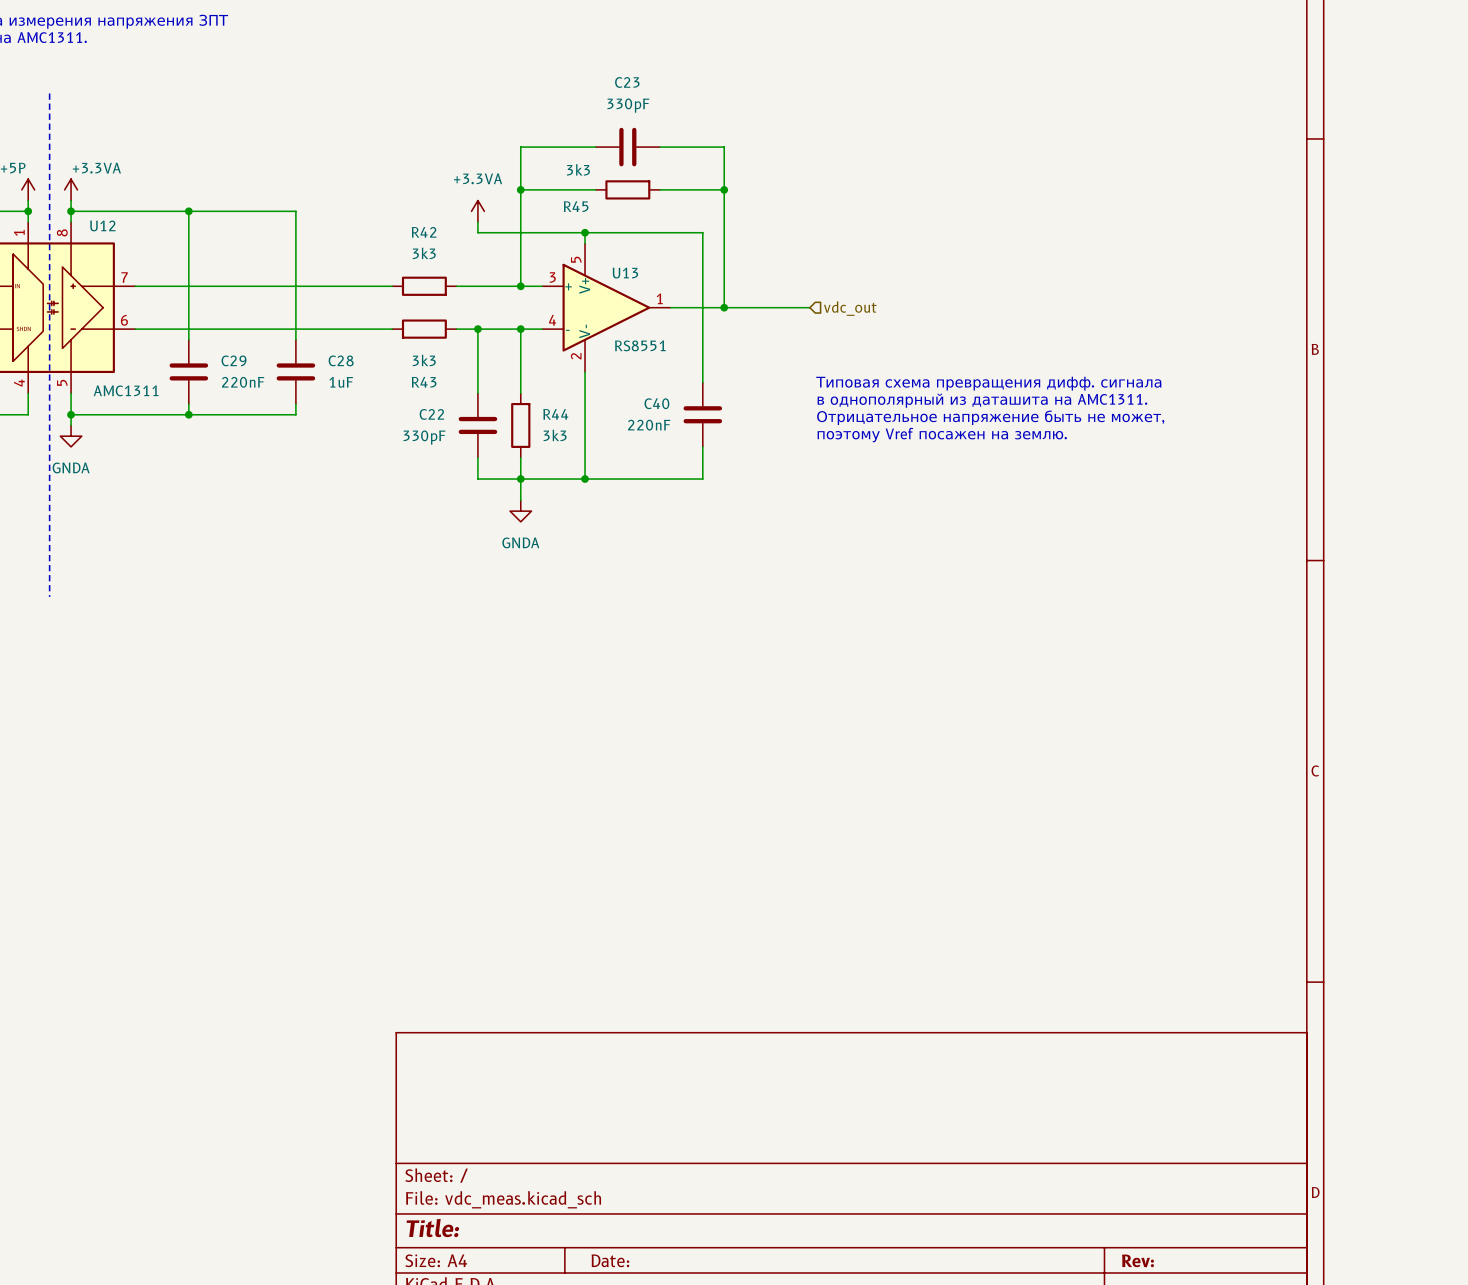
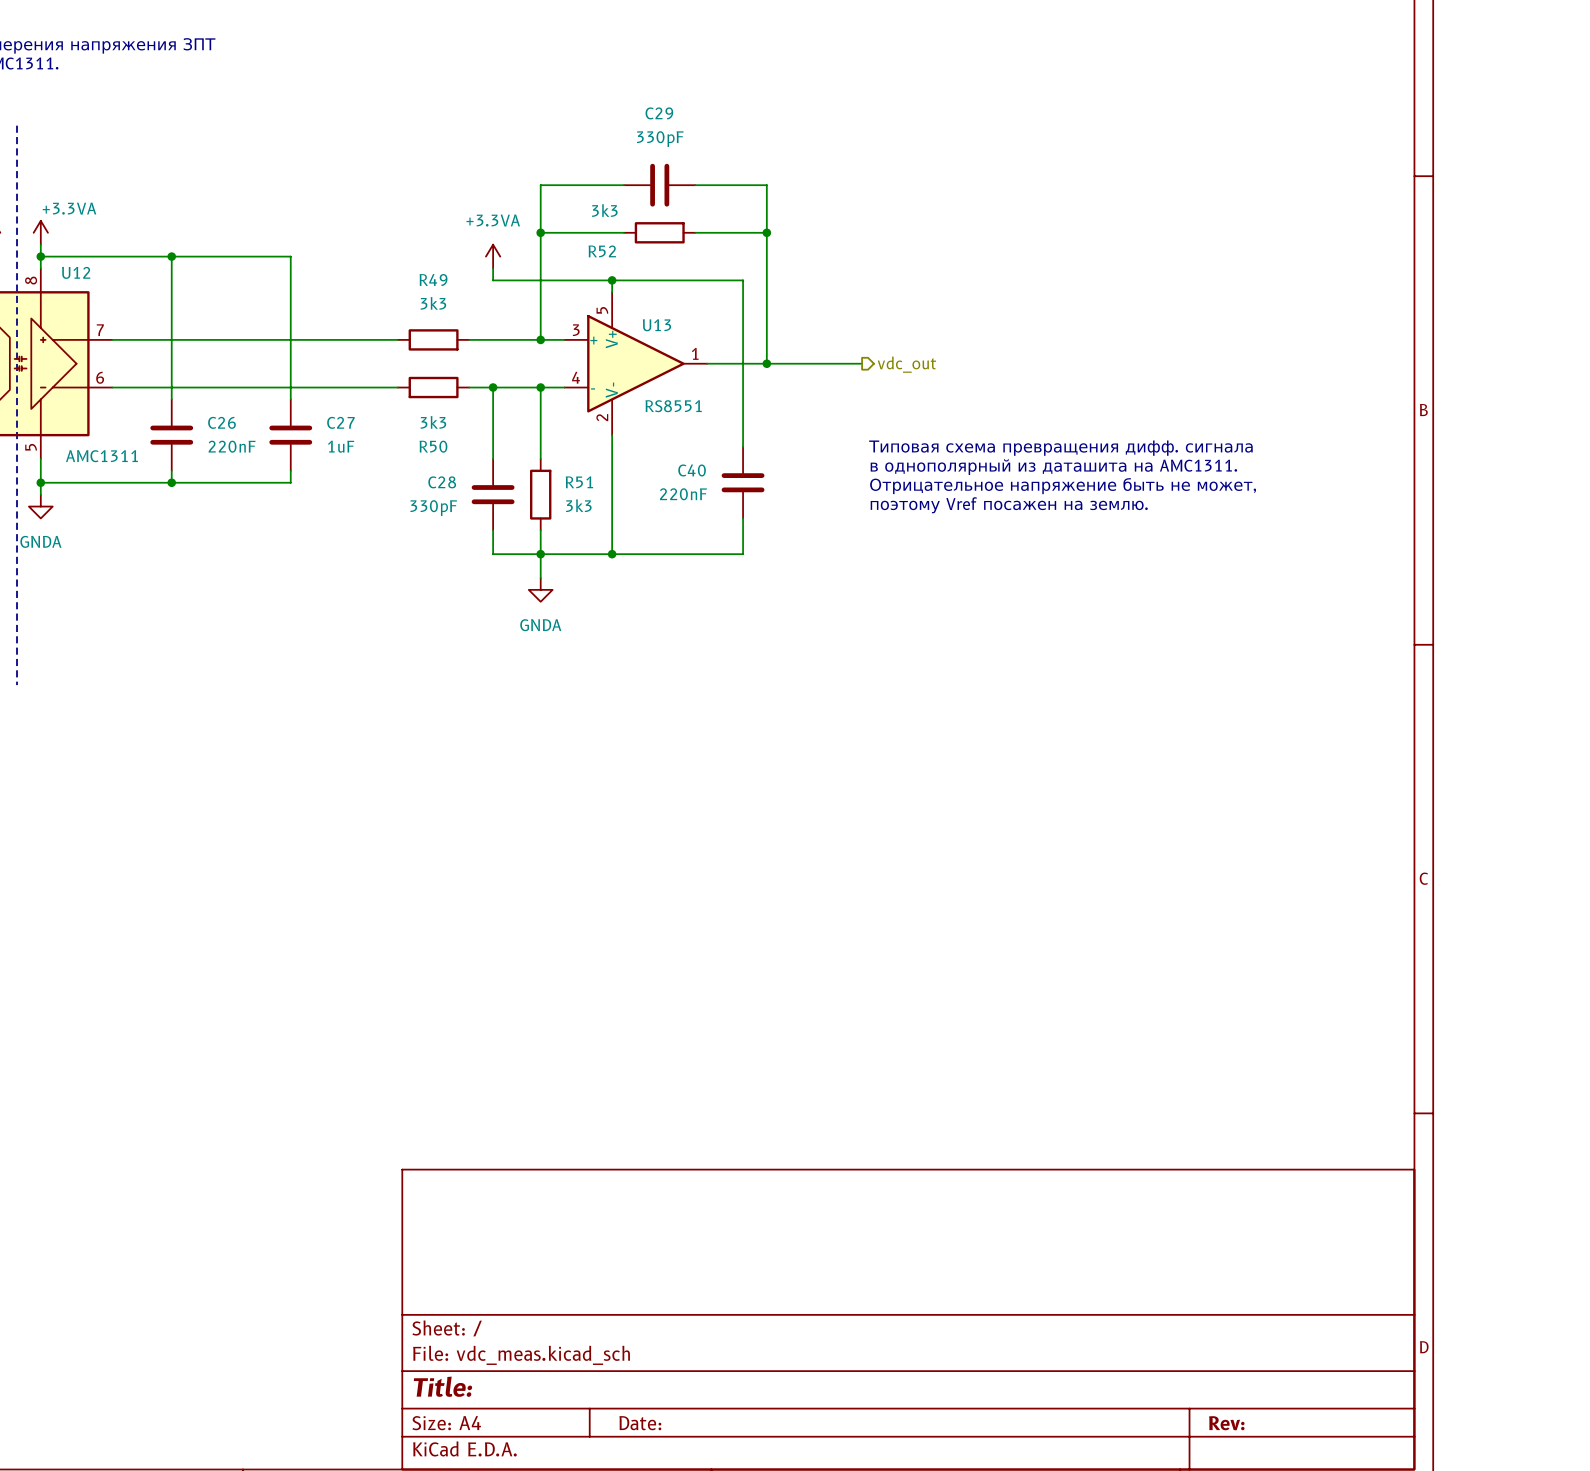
C23 name: C23 (627, 82) -> C29 (659, 113)
R45 name: R45 (576, 206) -> R52 (602, 251)
R42 name: R42 (424, 232) -> R49 (433, 280)
hierarchical label shape: input (850, 308) -> output (906, 364)
C29 name: C29 (234, 360) -> C26 (221, 422)
C28 name: C28 (341, 360) -> C27 (340, 422)
R43 name: R43 (424, 382) -> R50 (433, 446)
C22 name: C22 (431, 414) -> C28 (442, 482)
R44 name: R44 (555, 414) -> R51 (579, 482)

